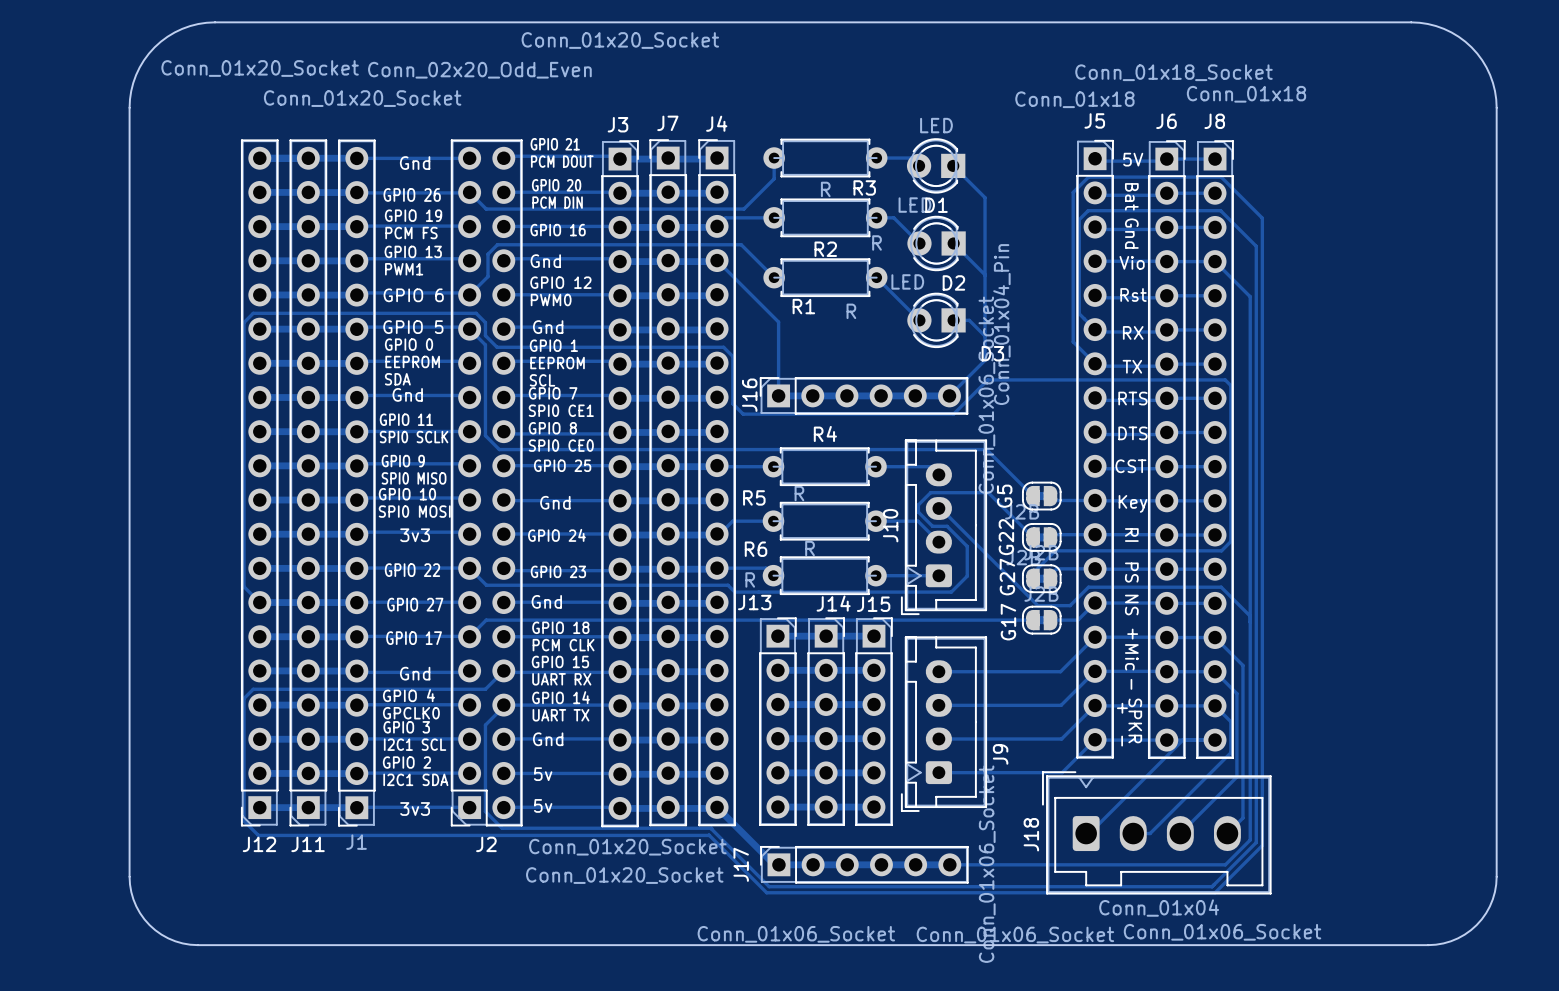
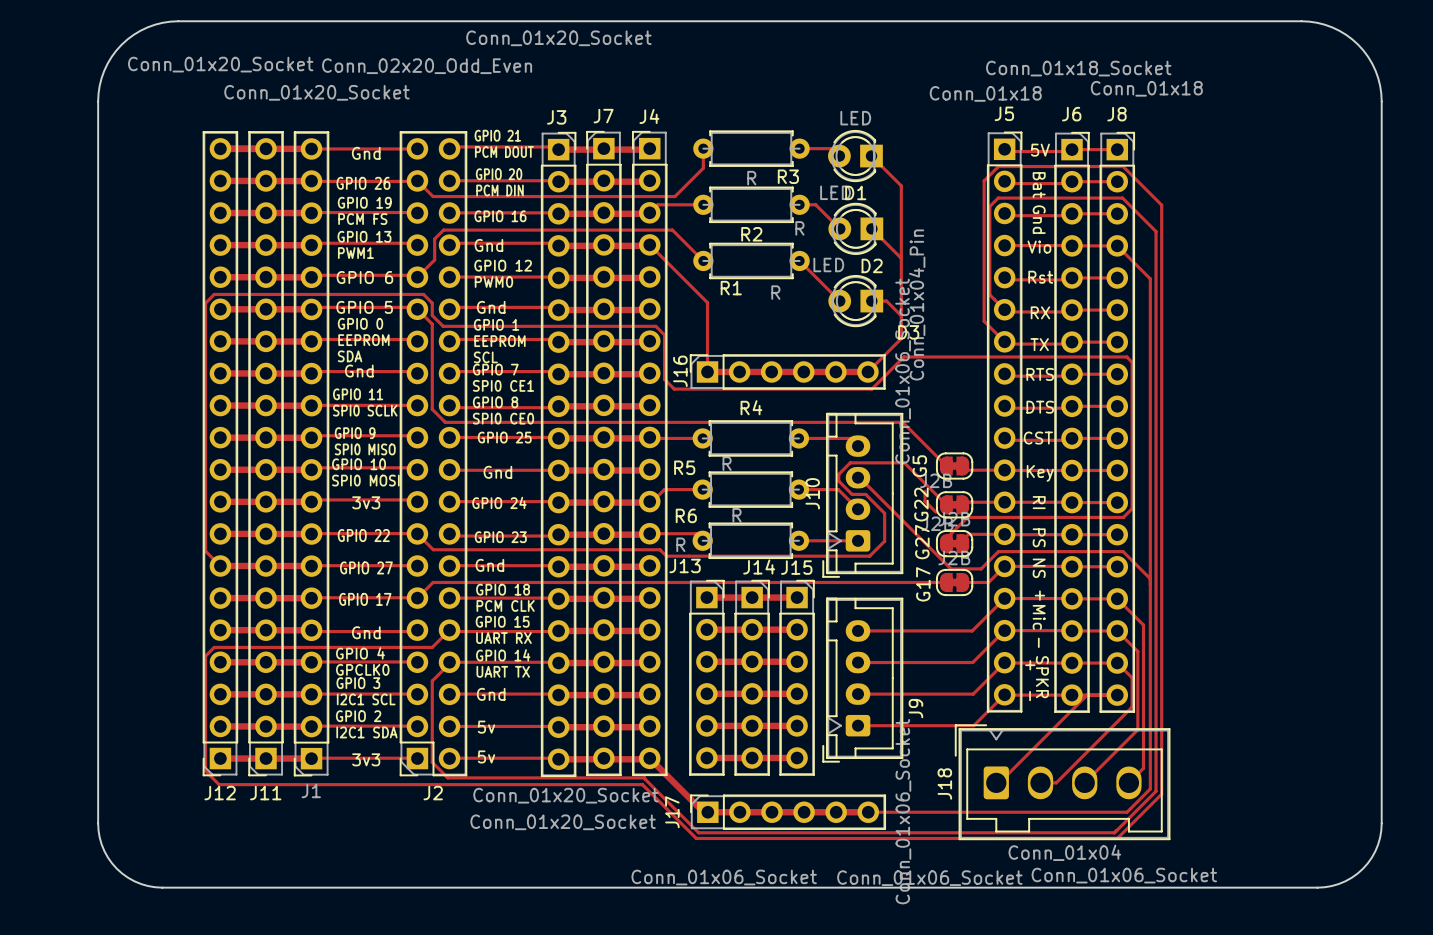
track: none -> (924, 491) (924, 501) (935, 512)

